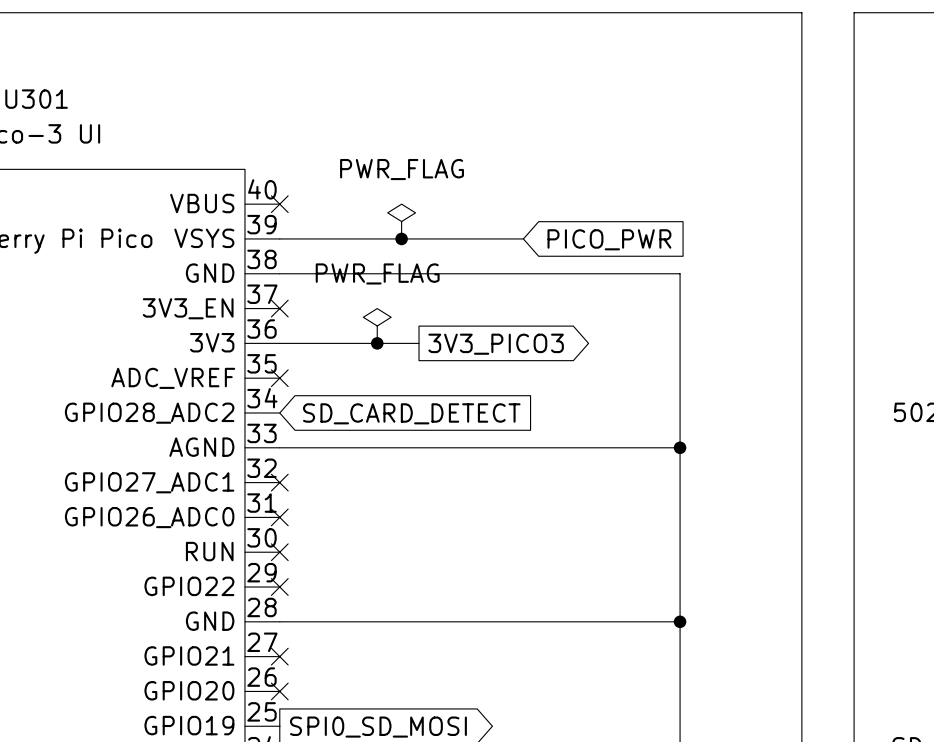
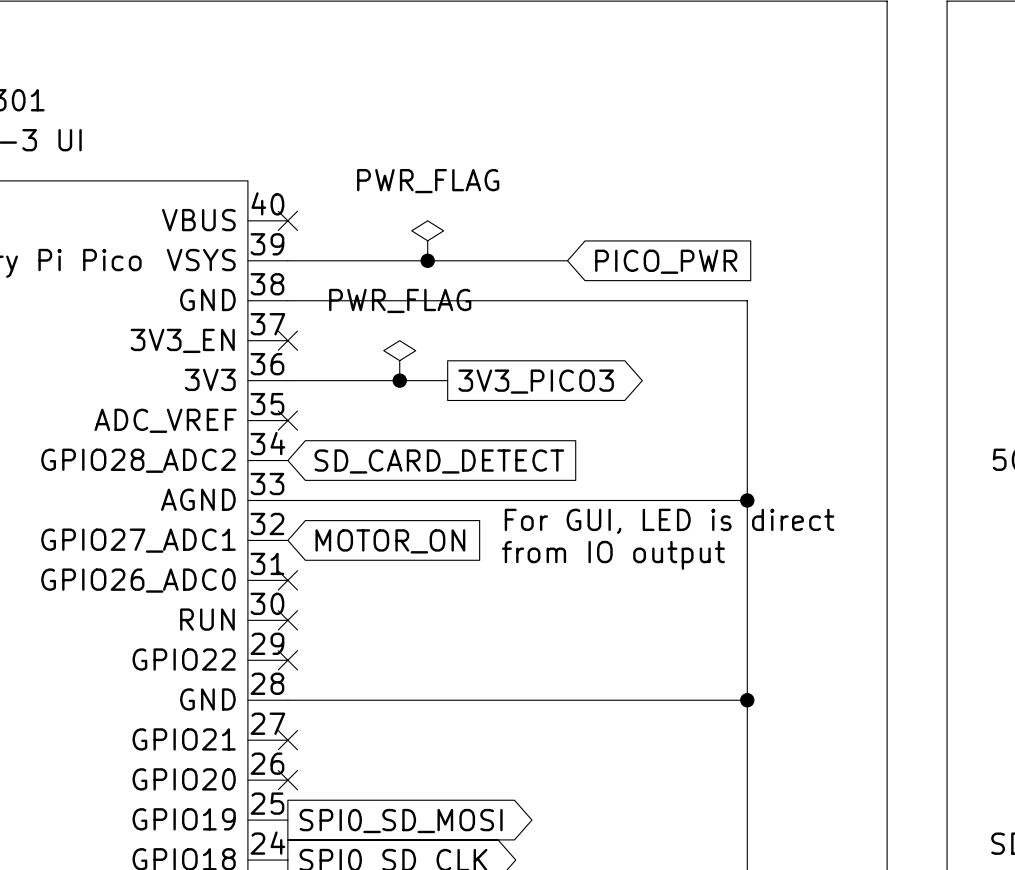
text: none -> For GUI, LED is direct (669, 521)
no-connect mark: (279, 482) -> none
global label: none -> MOTOR_ON (390, 541)
text: none -> from IO output (613, 555)

